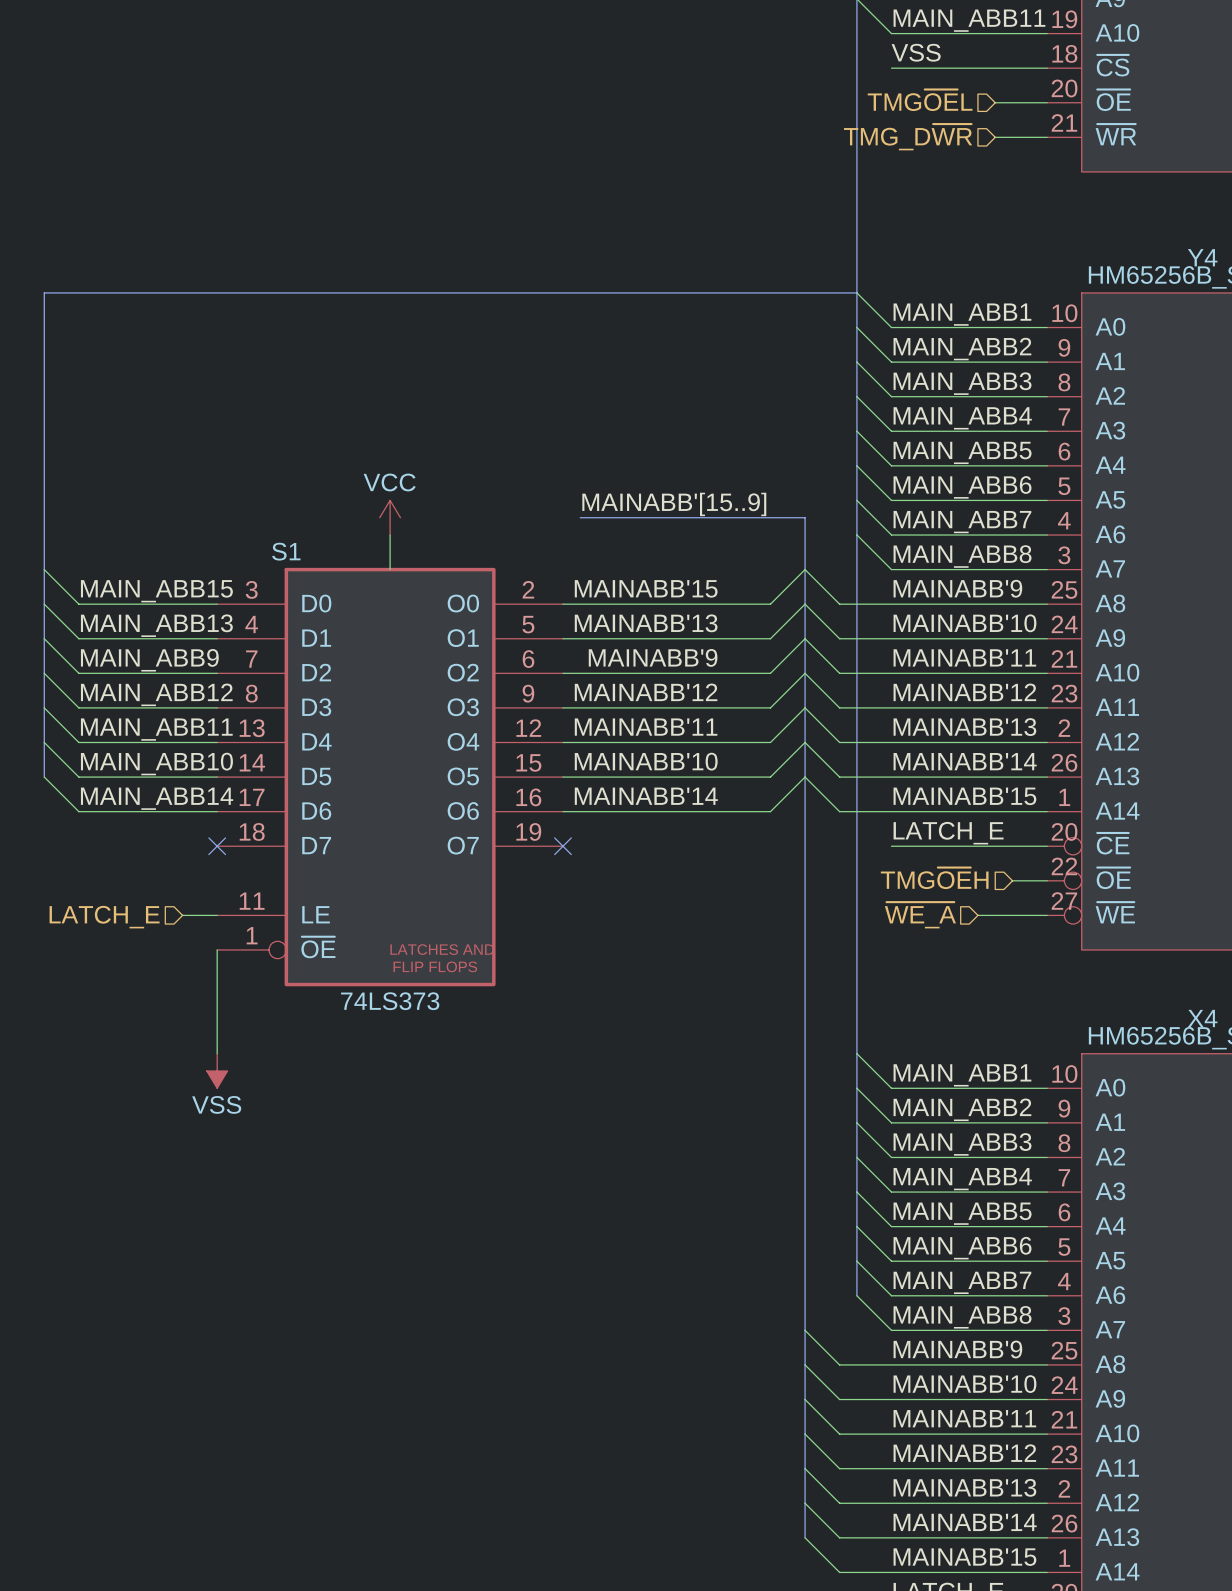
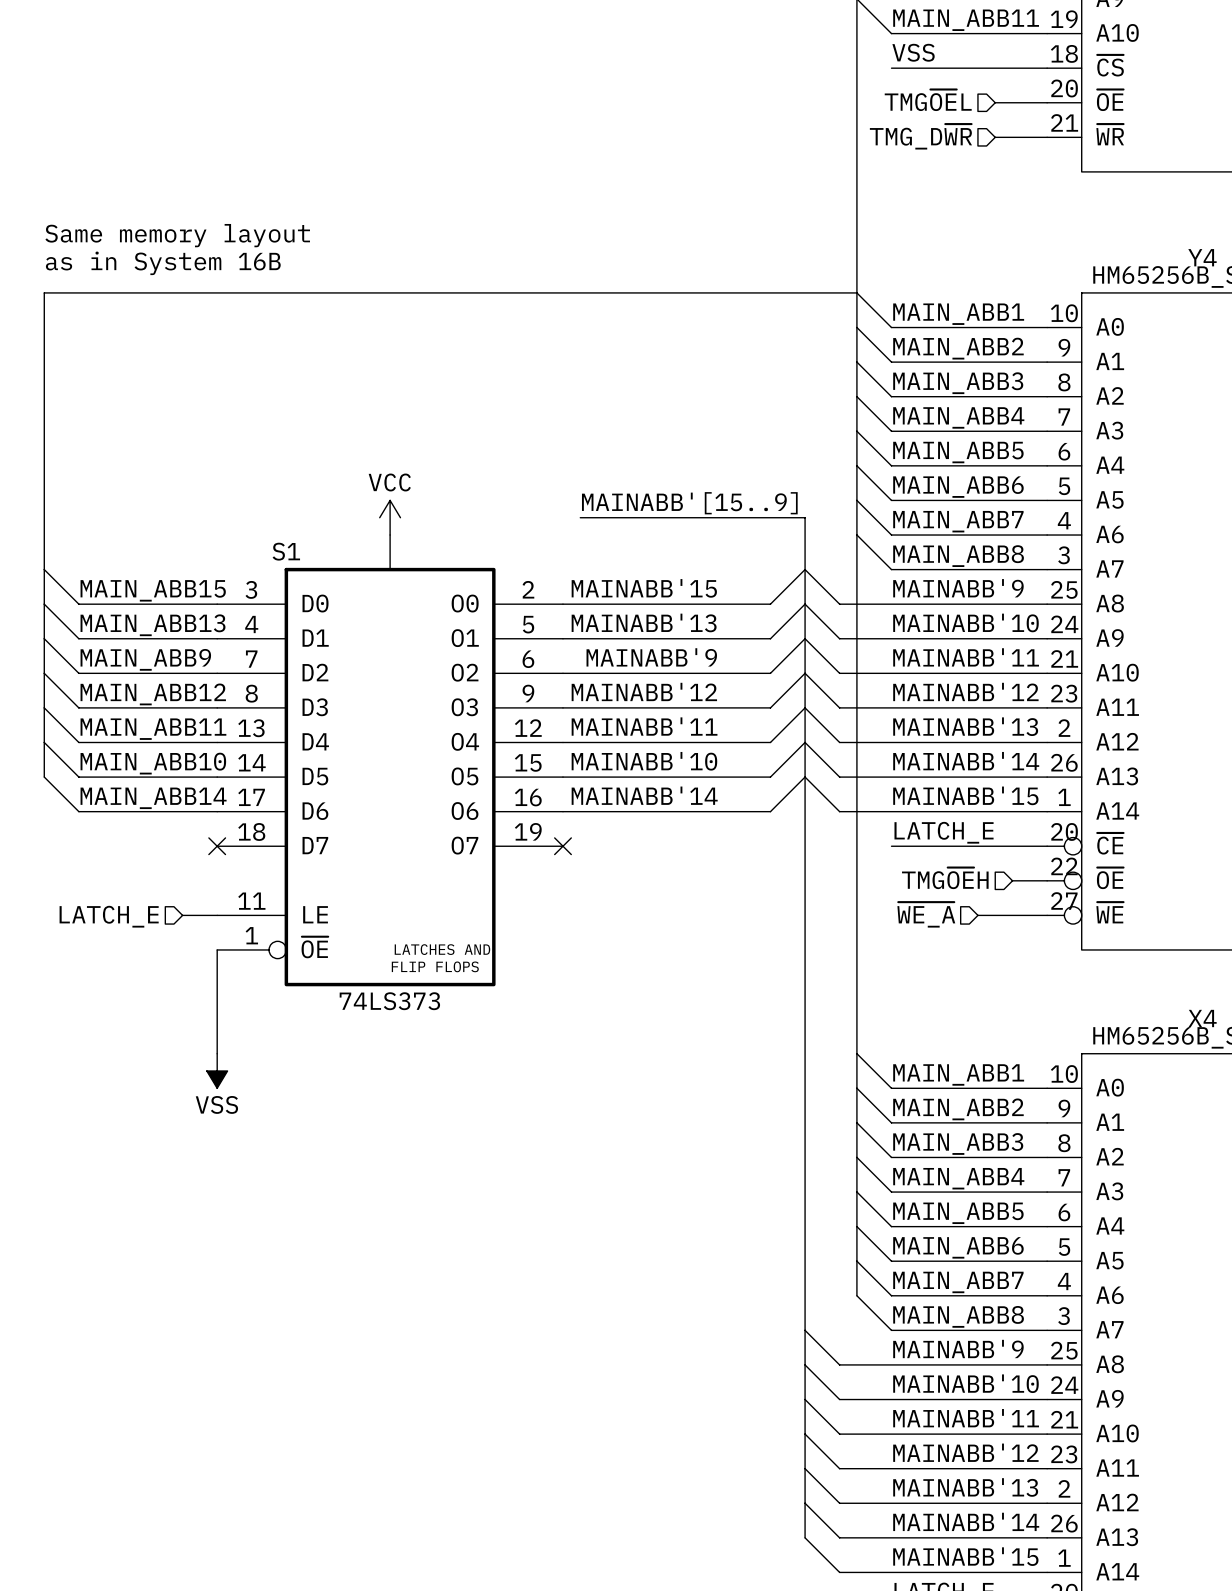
text: none -> Same memory layout (177, 235)
text: none -> as in System 16B (163, 263)

